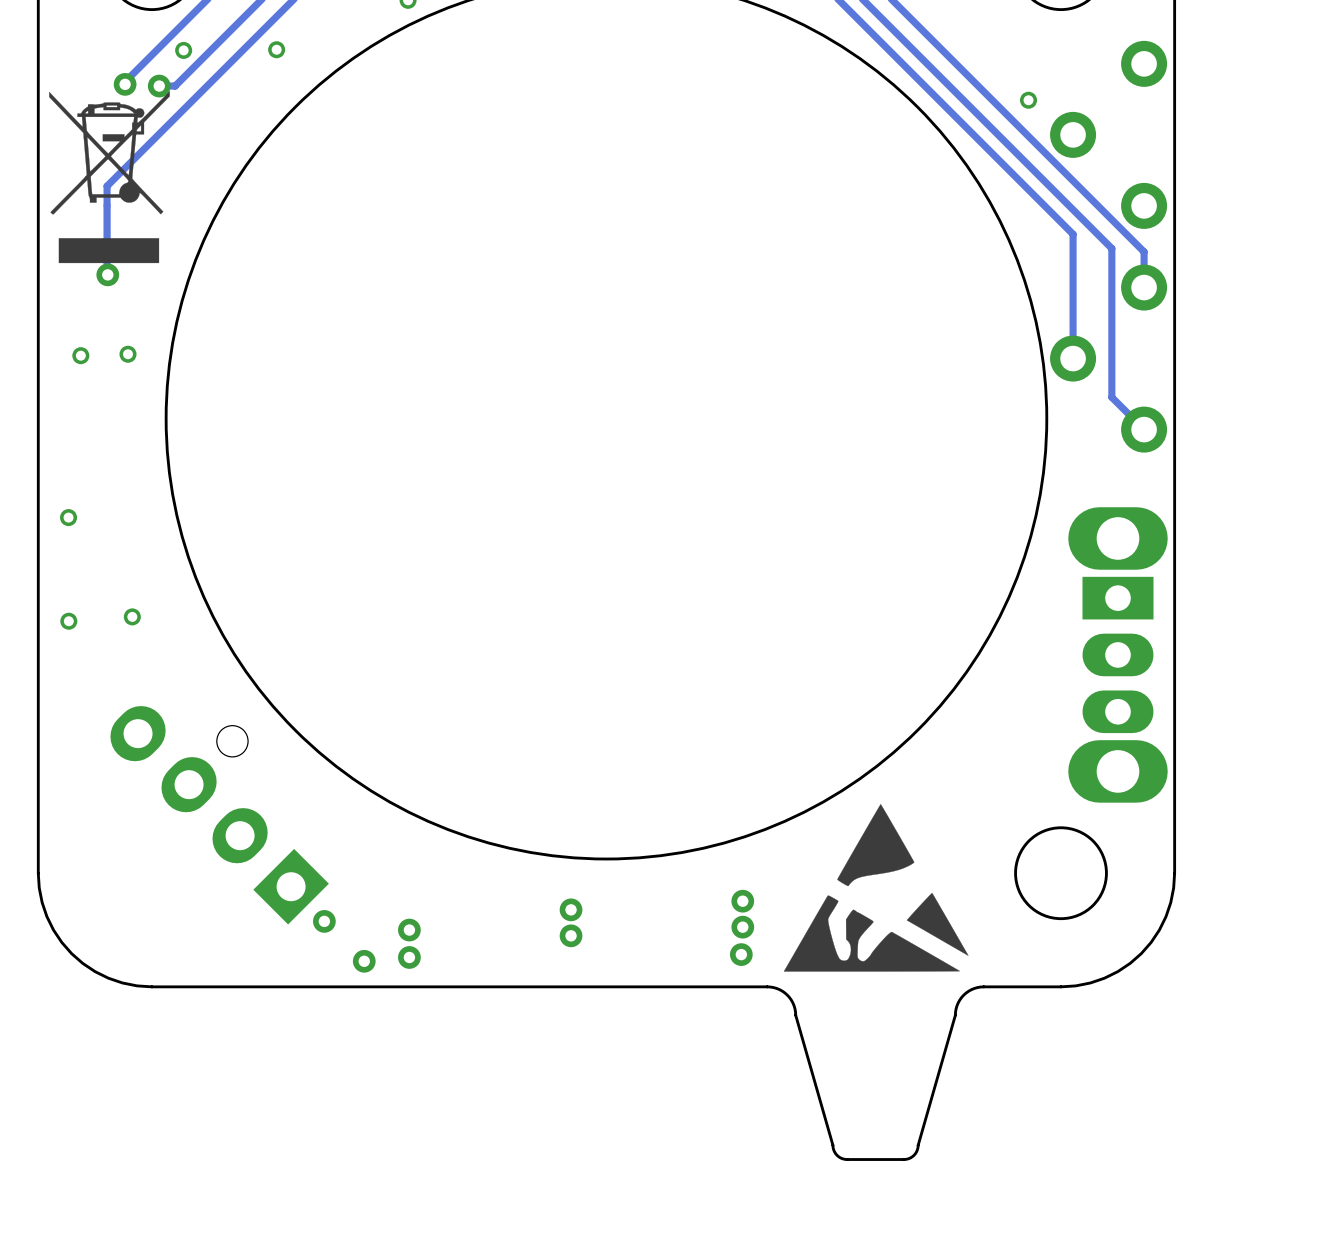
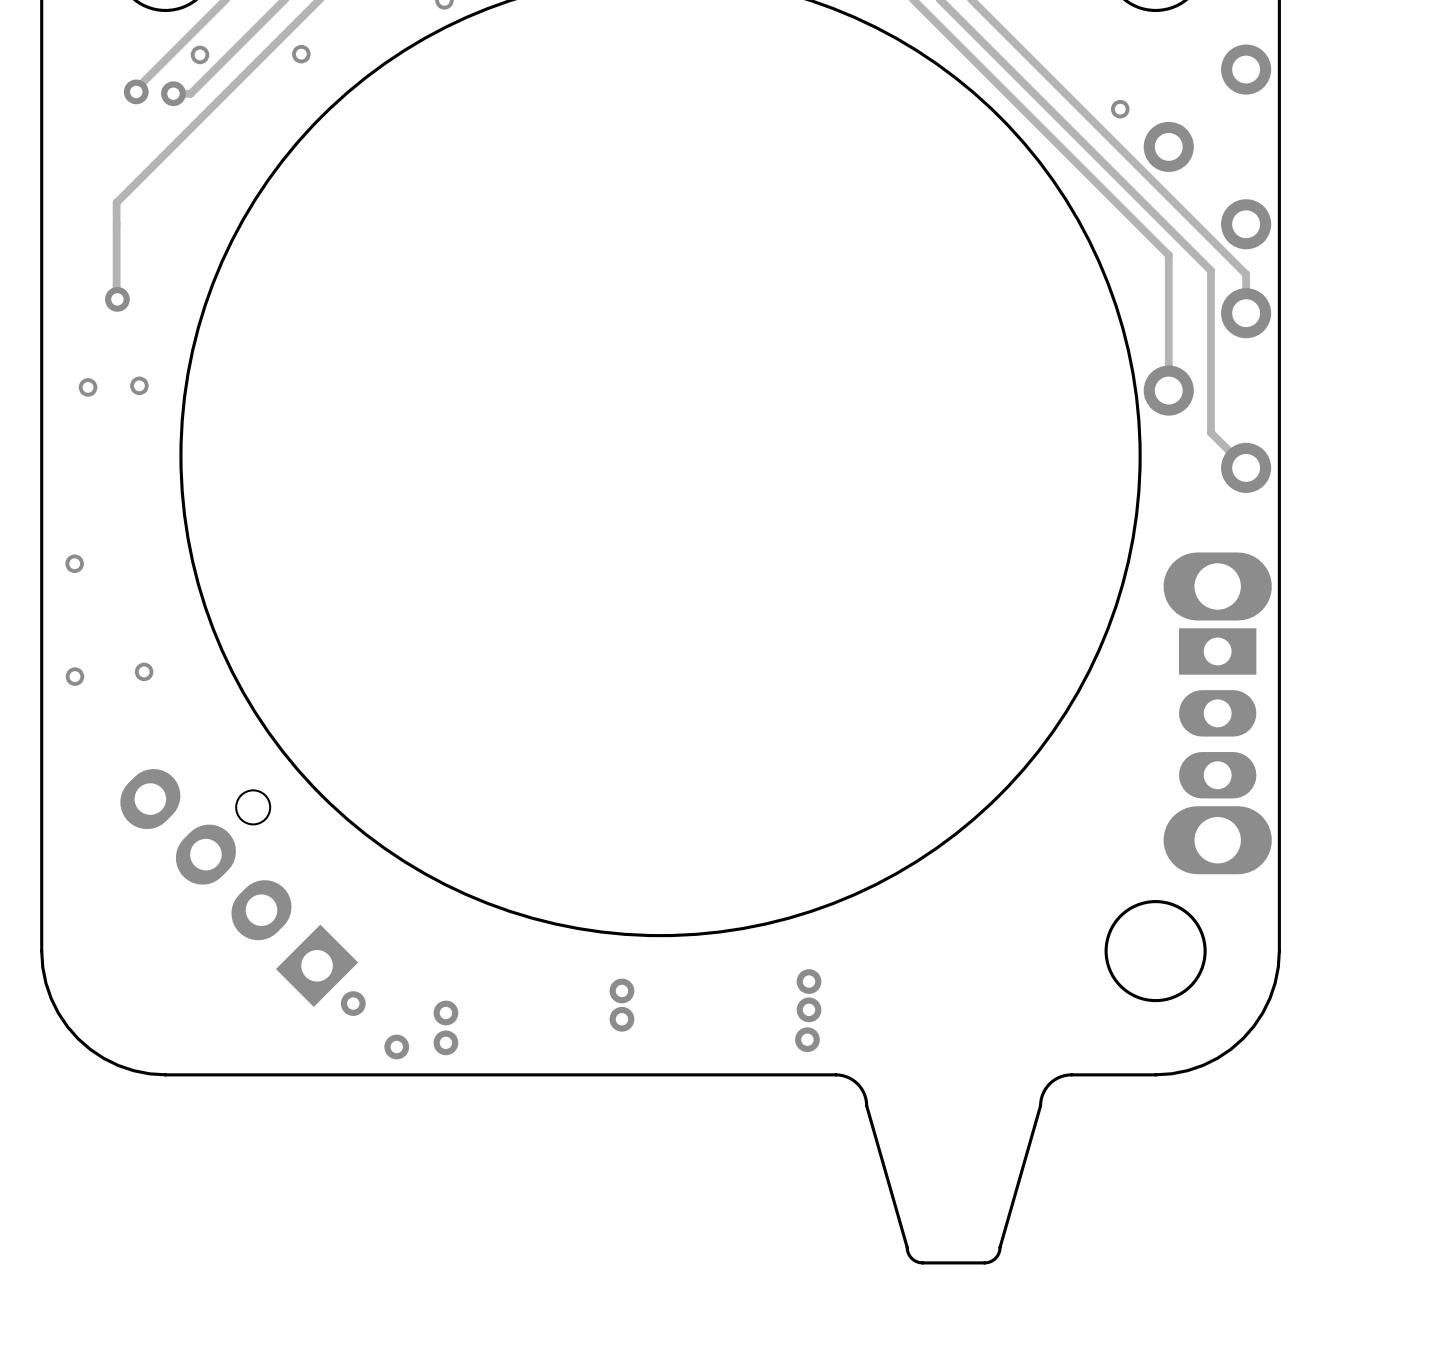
drawing: [49, 91, 170, 264] -> none
drawing: [783, 804, 969, 972] -> none

